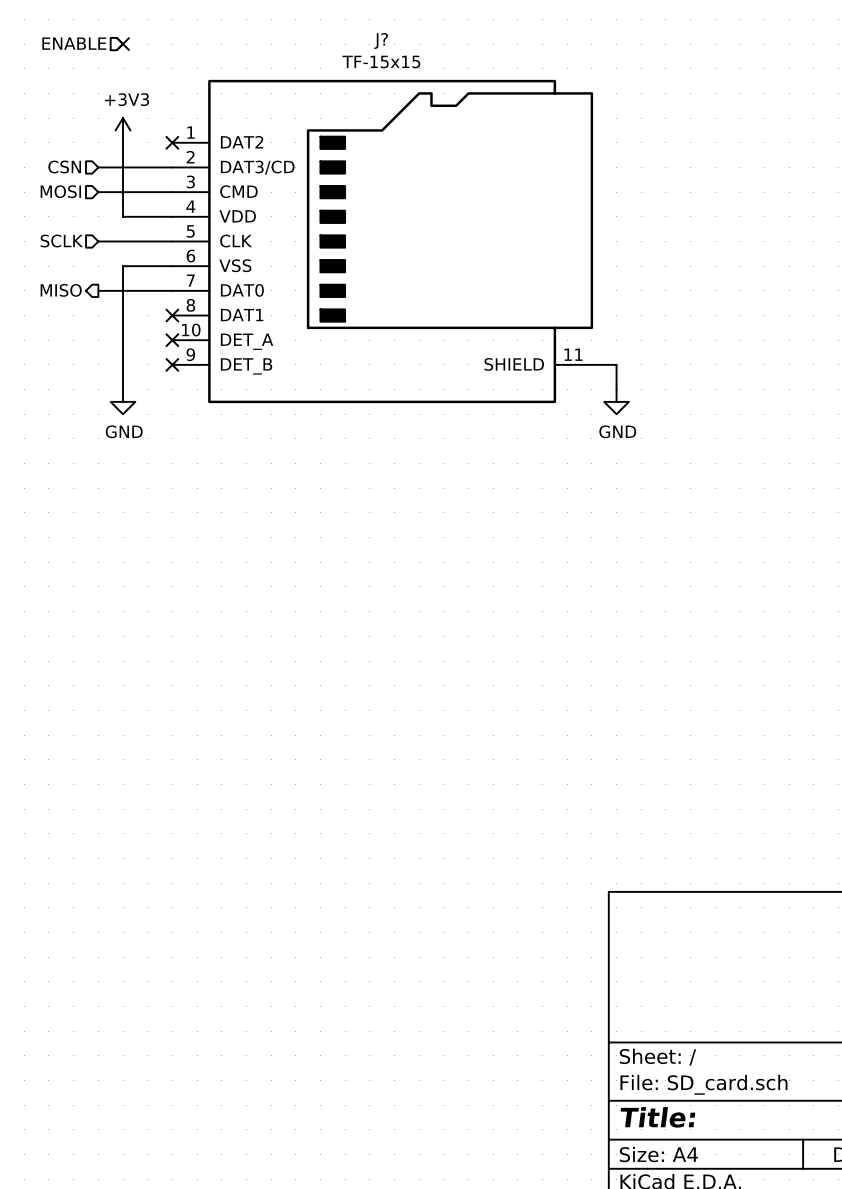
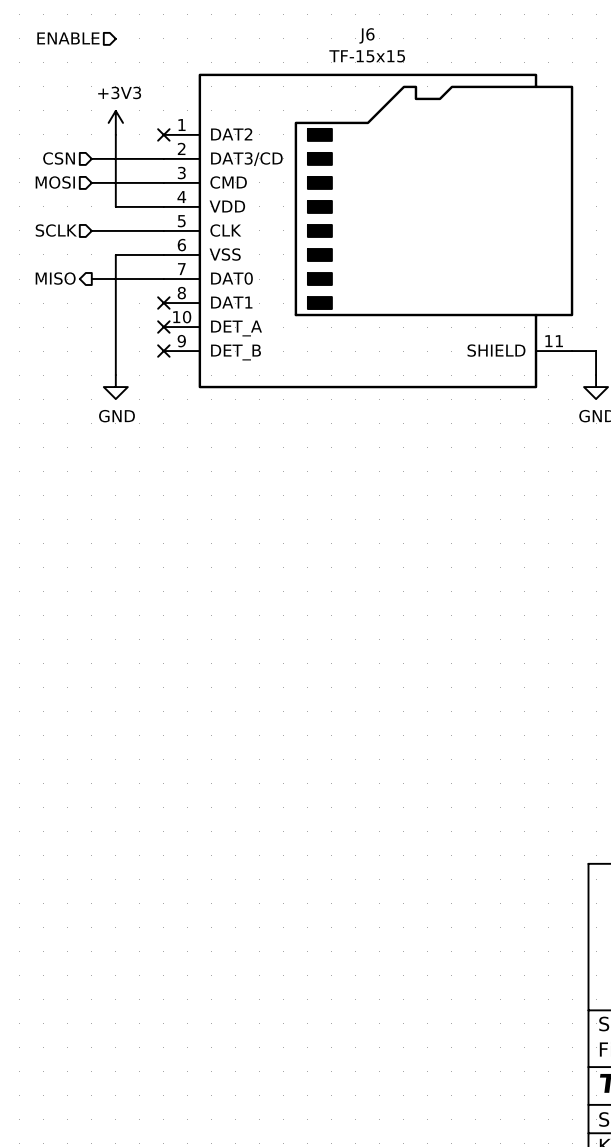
J? name: J? (381, 41) -> J6 (366, 35)
no-connect mark: (123, 44) -> none

